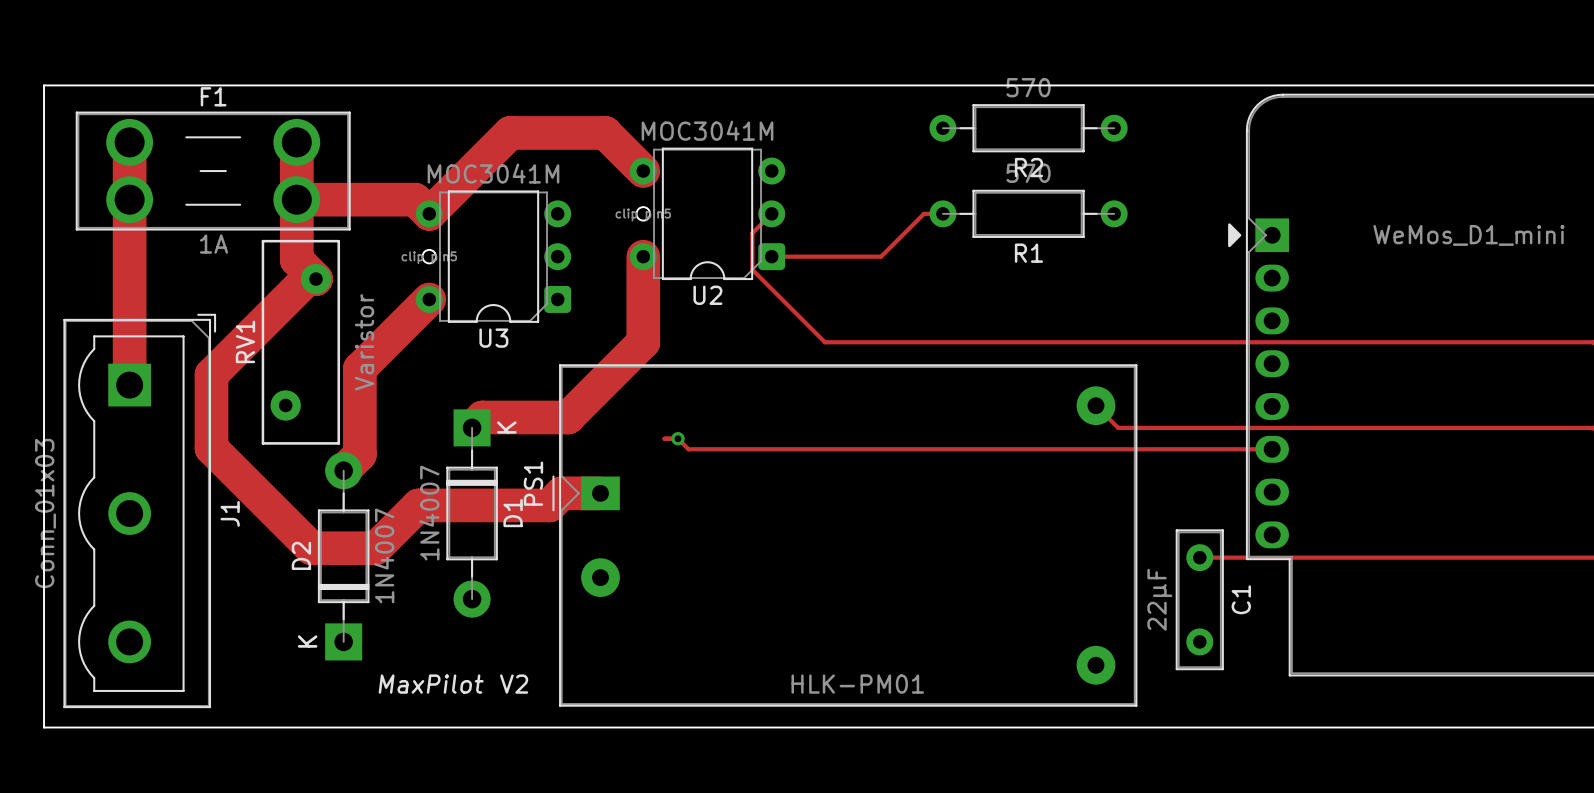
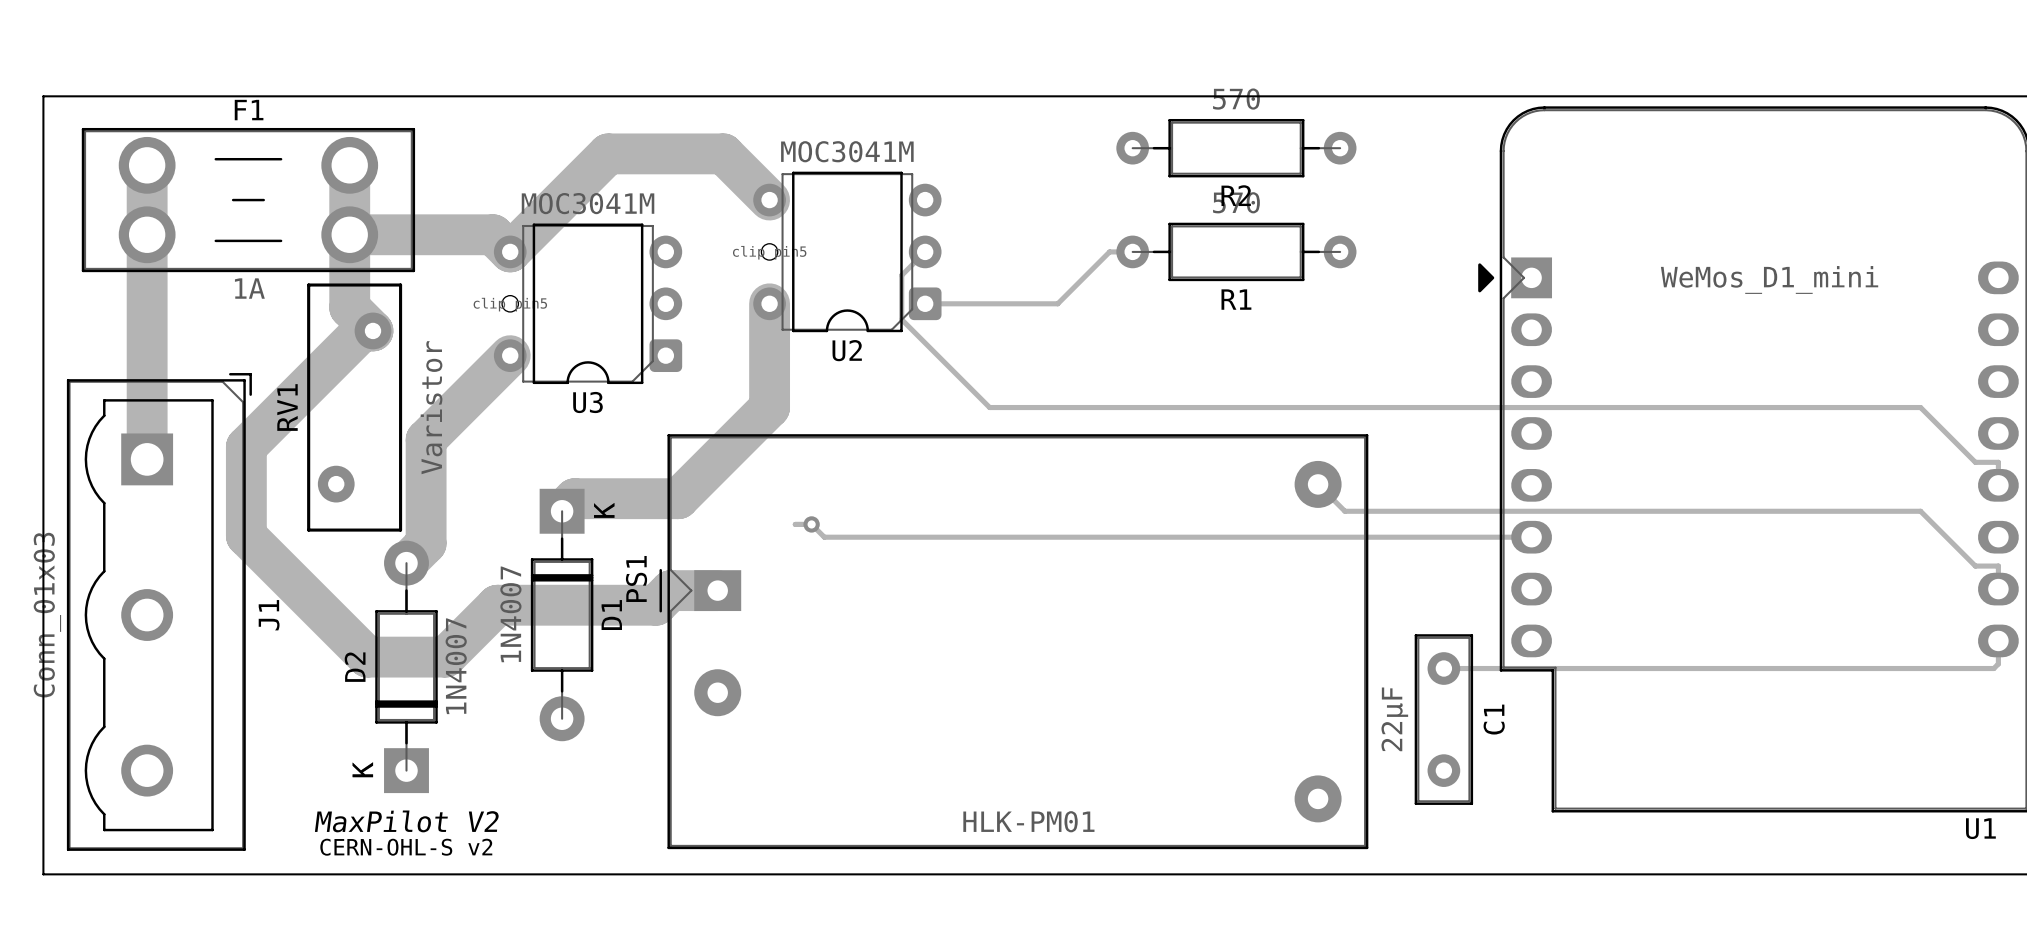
text: MaxPilot (431, 684) -> MaxPilot V2 (406, 821)
text: V2 (514, 684) -> none
text: none -> CERN-OHL-S v2 (406, 847)

